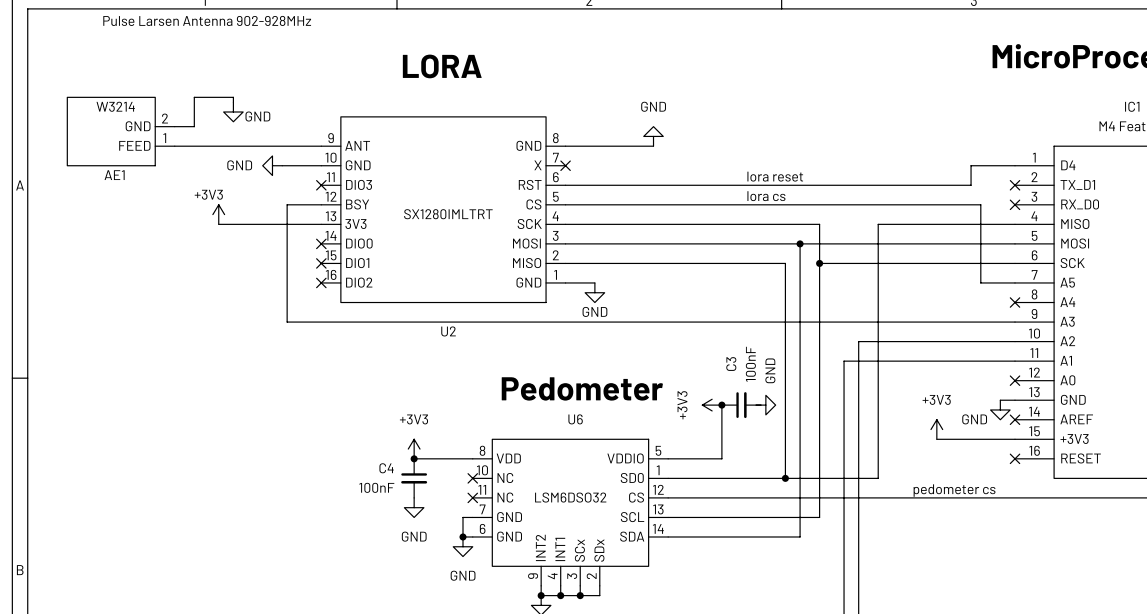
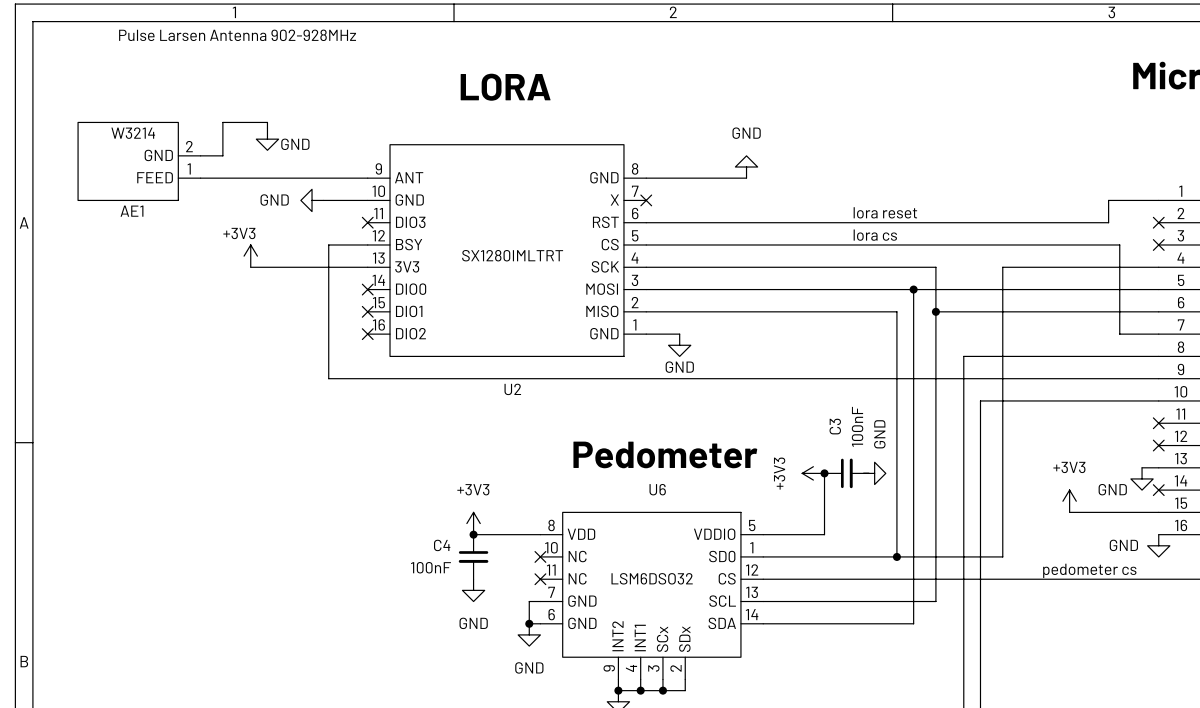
no-connect mark: (1015, 302) -> none
wire: (844, 361) (1015, 361) -> (963, 423) (963, 356) (1158, 356)
no-connect mark: none -> (1158, 423)
no-connect mark: (1015, 458) -> none
power symbol: none -> GND (1158, 545)

